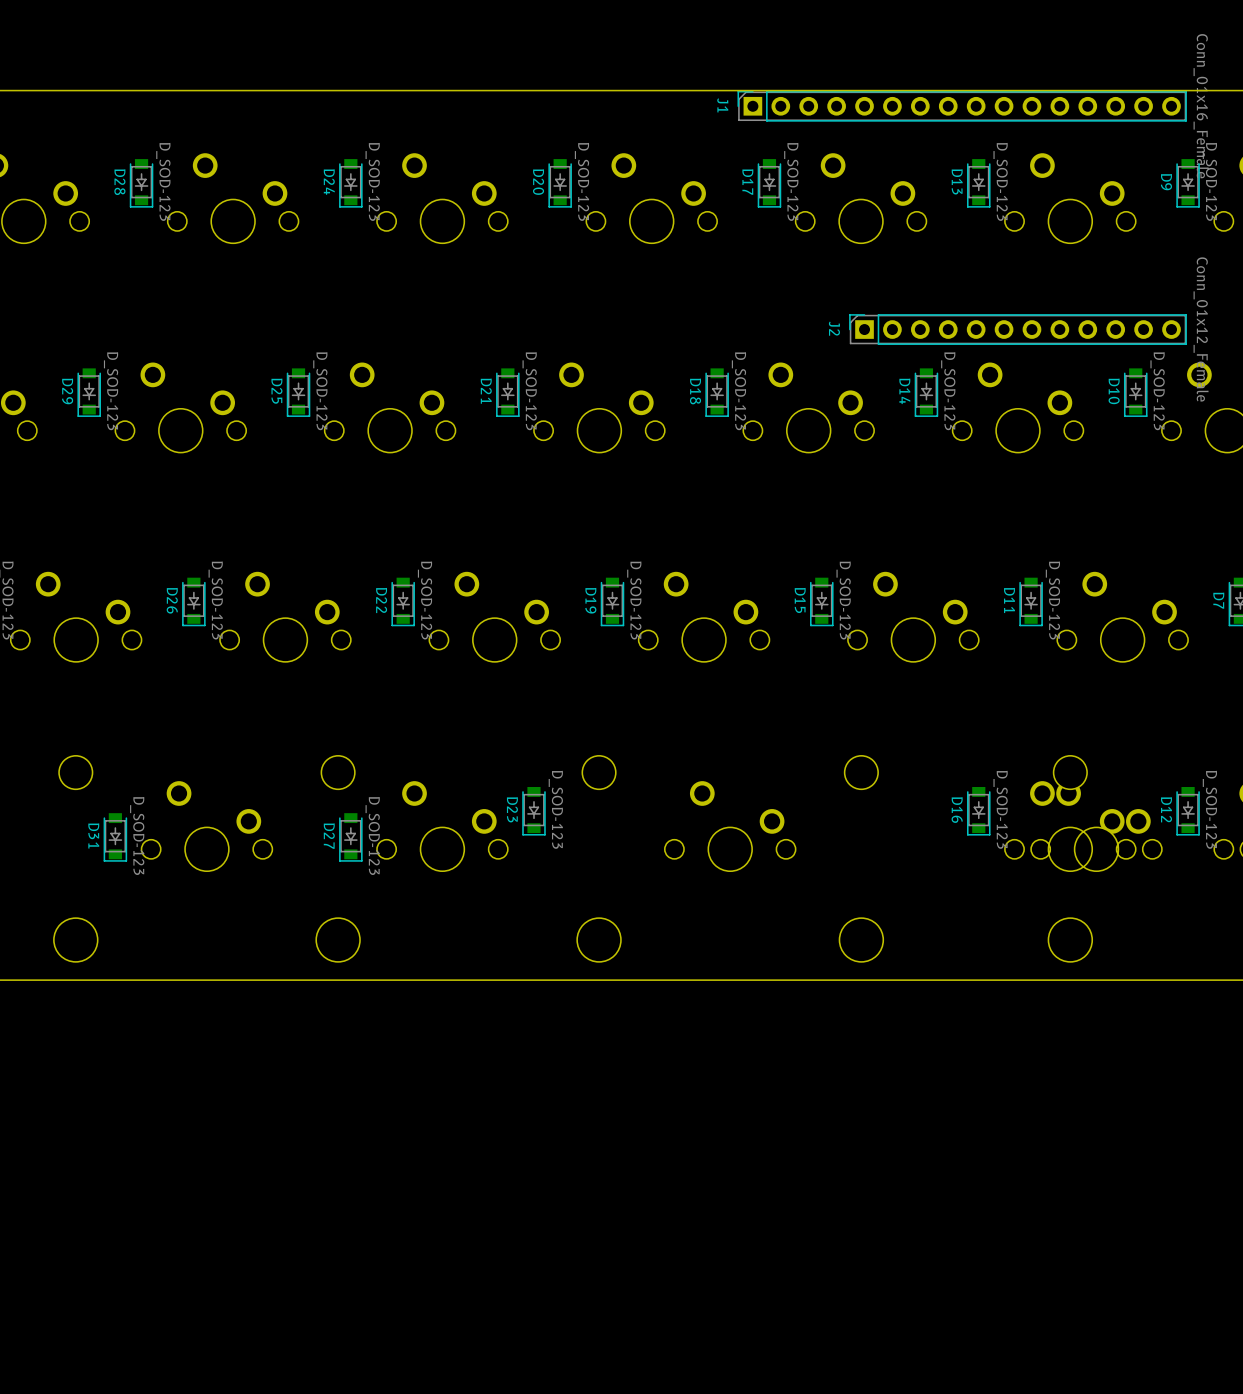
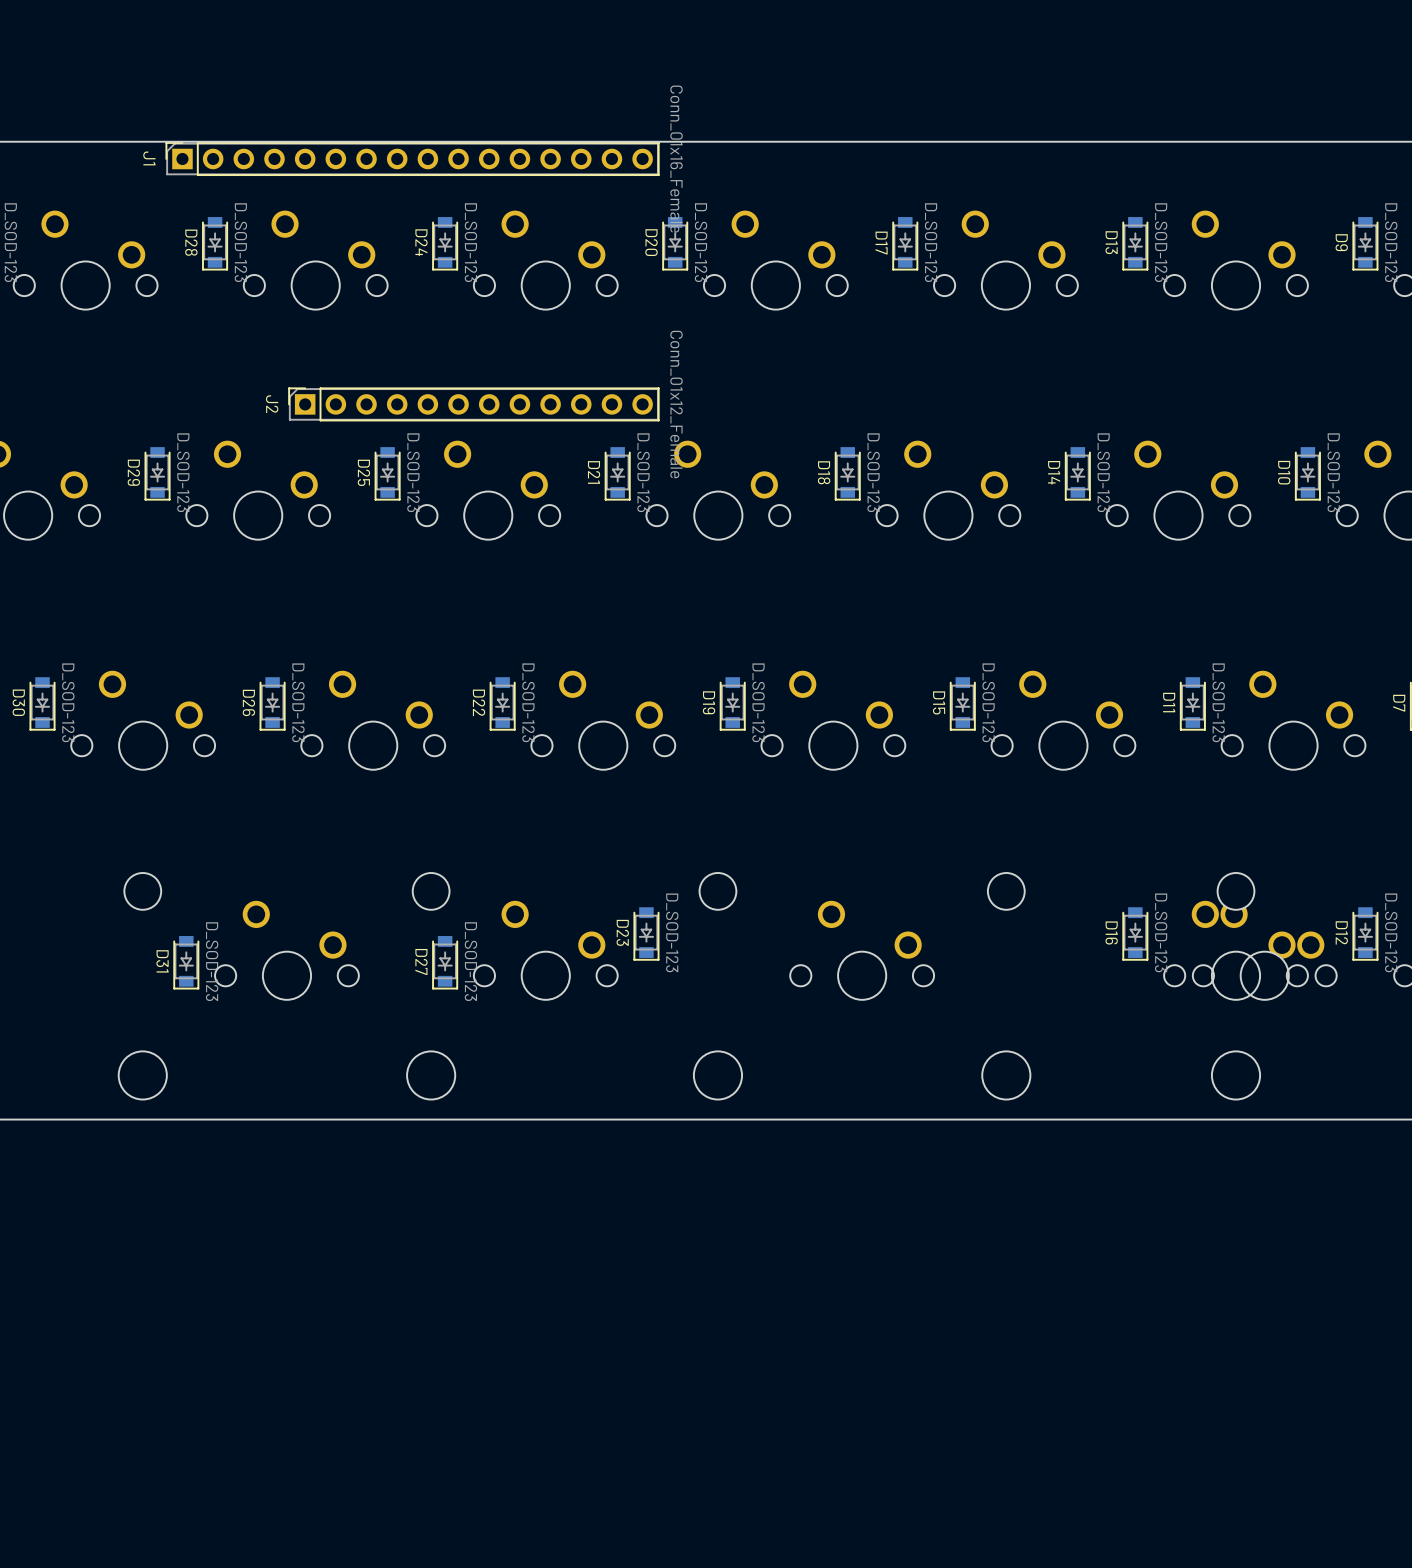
J1 position: (962, 106) -> (412, 158)
J2 position: (1018, 329) -> (473, 404)

